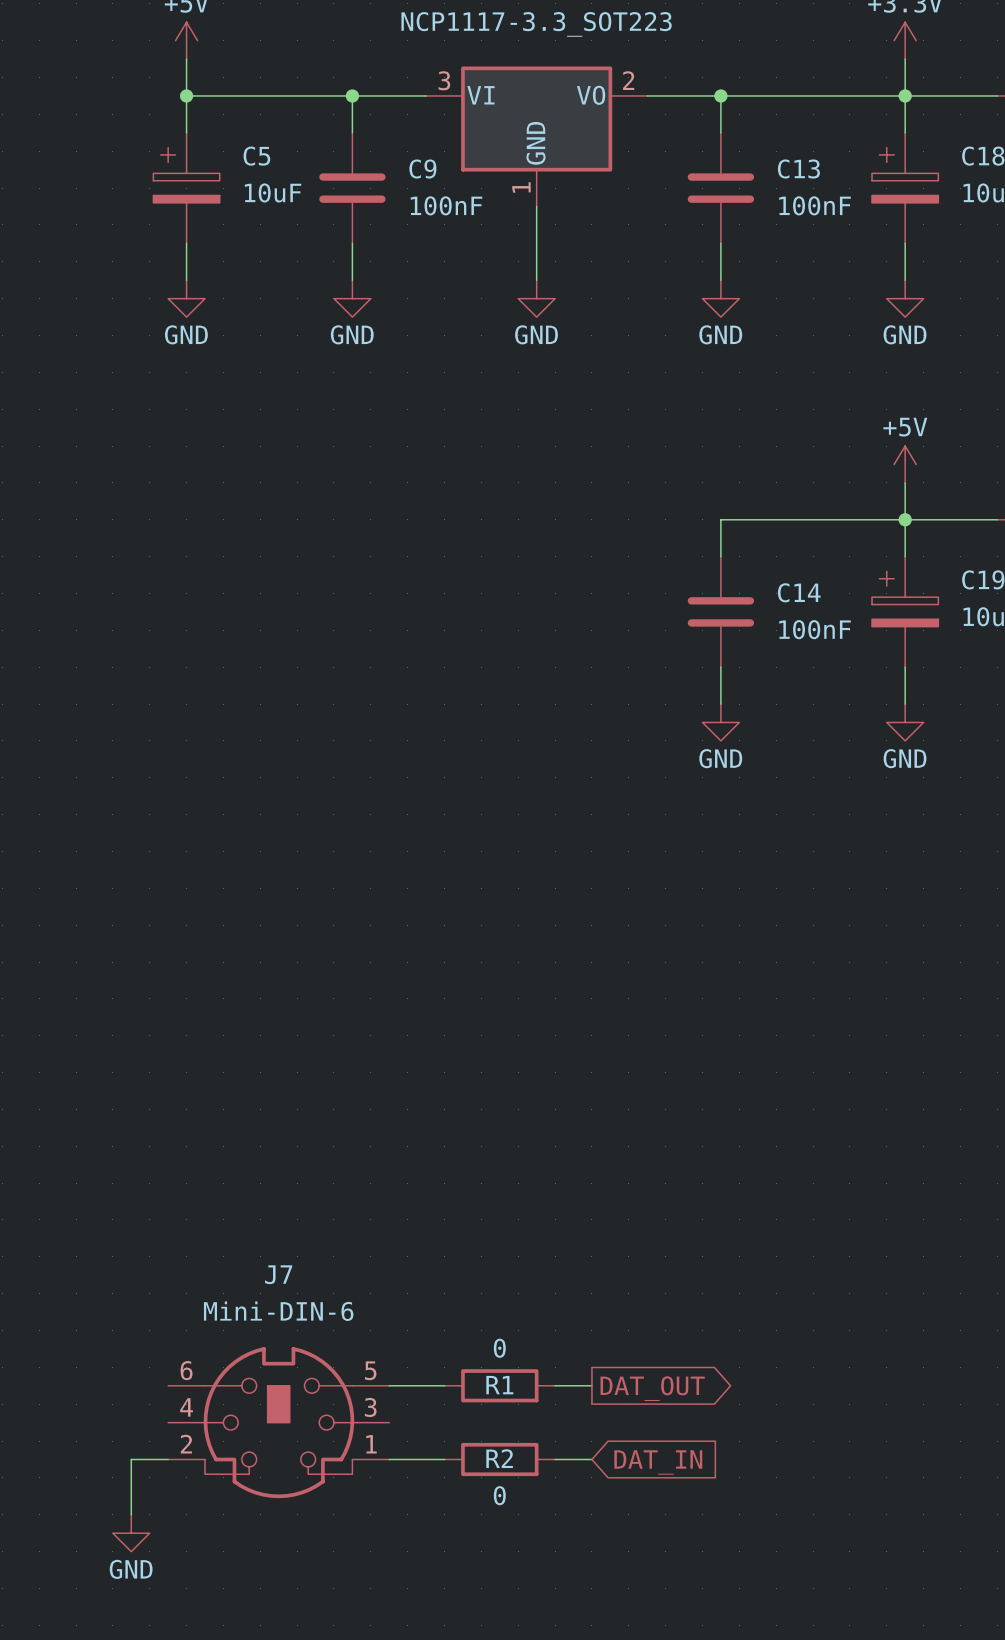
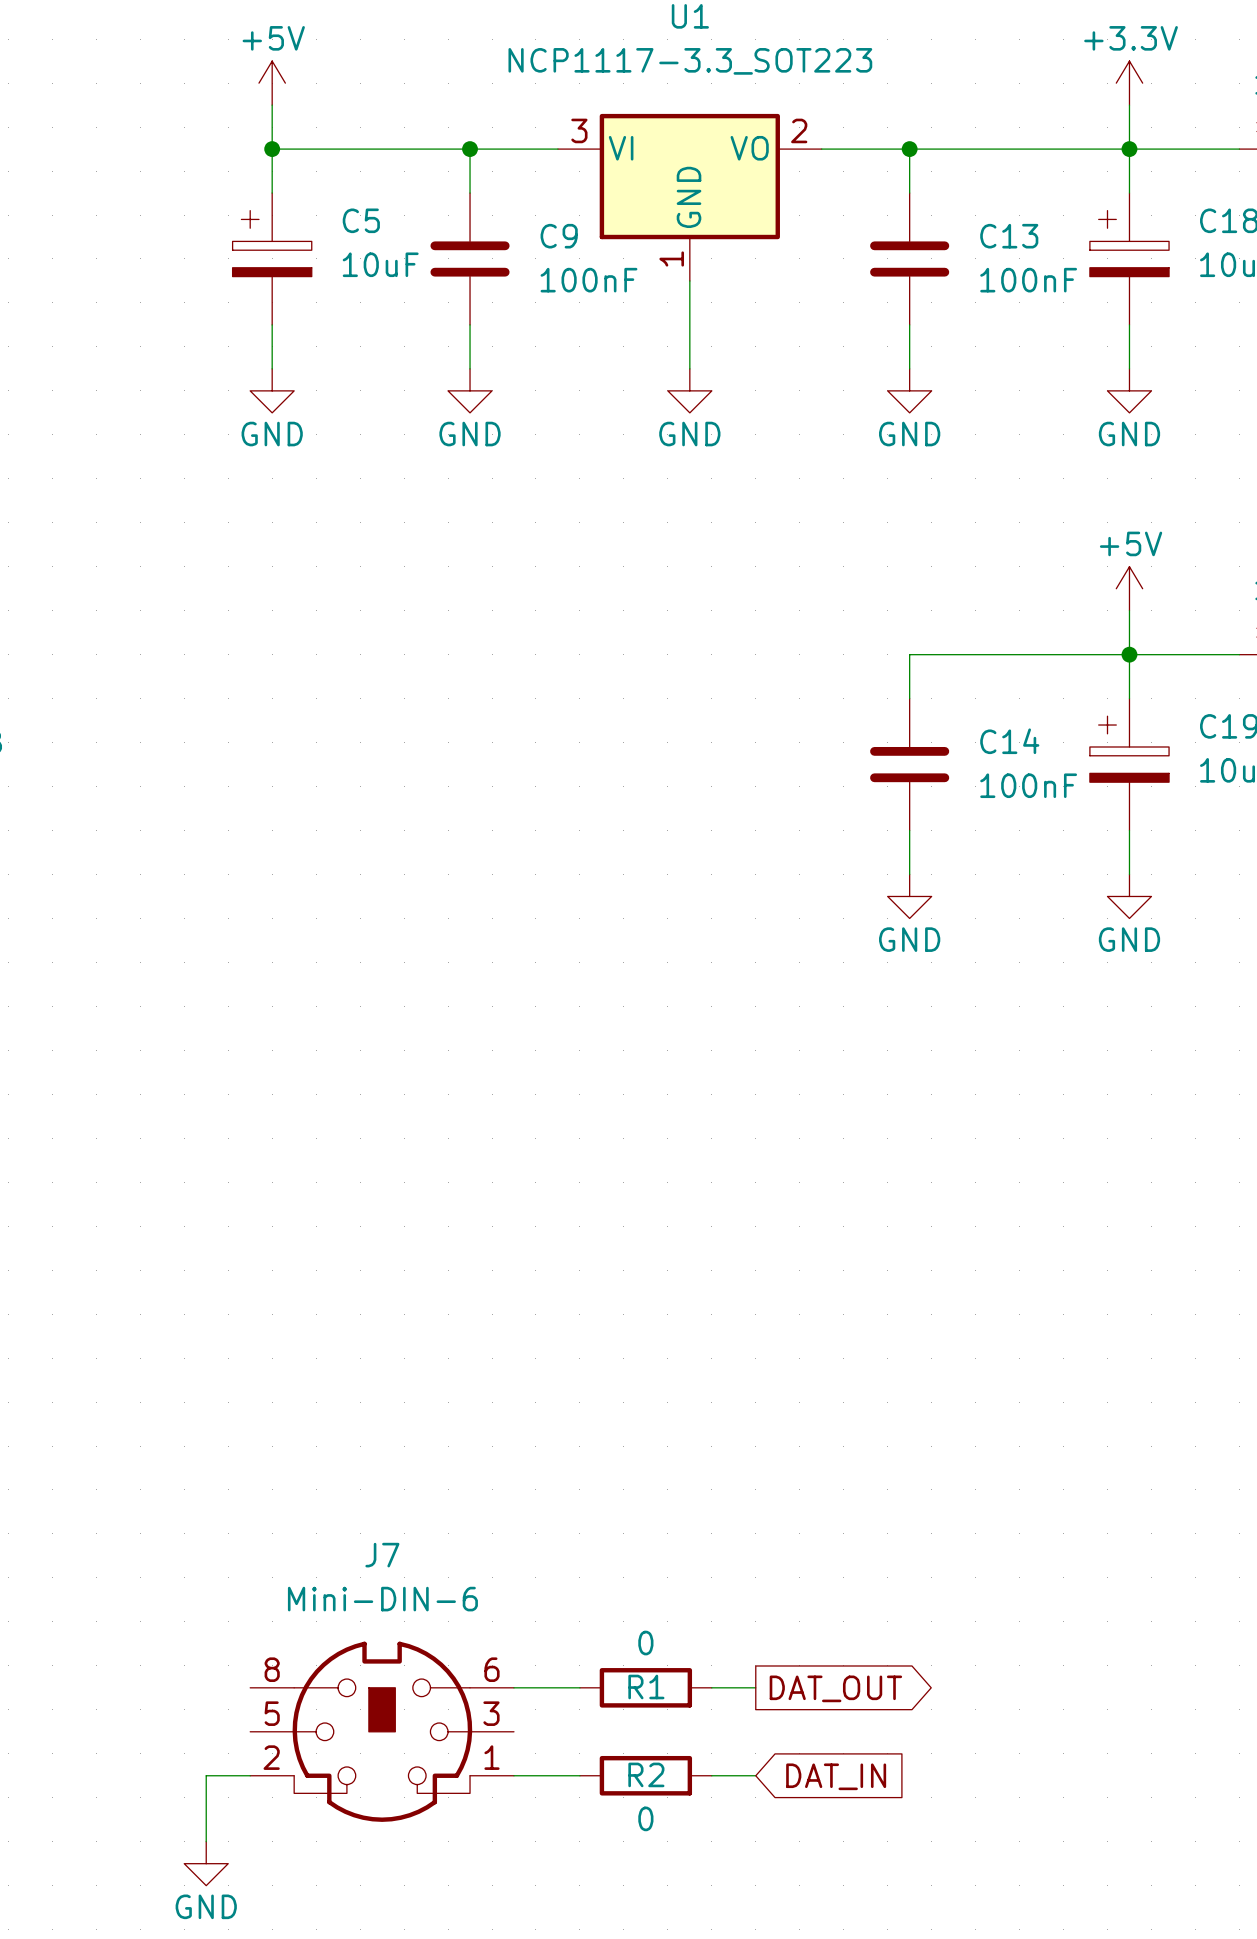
J7 pin number: 6 (186, 1370) -> 8 (272, 1669)
J7 pin number: 5 (370, 1370) -> 6 (492, 1669)
J7 pin number: 4 (186, 1407) -> 5 (272, 1713)

